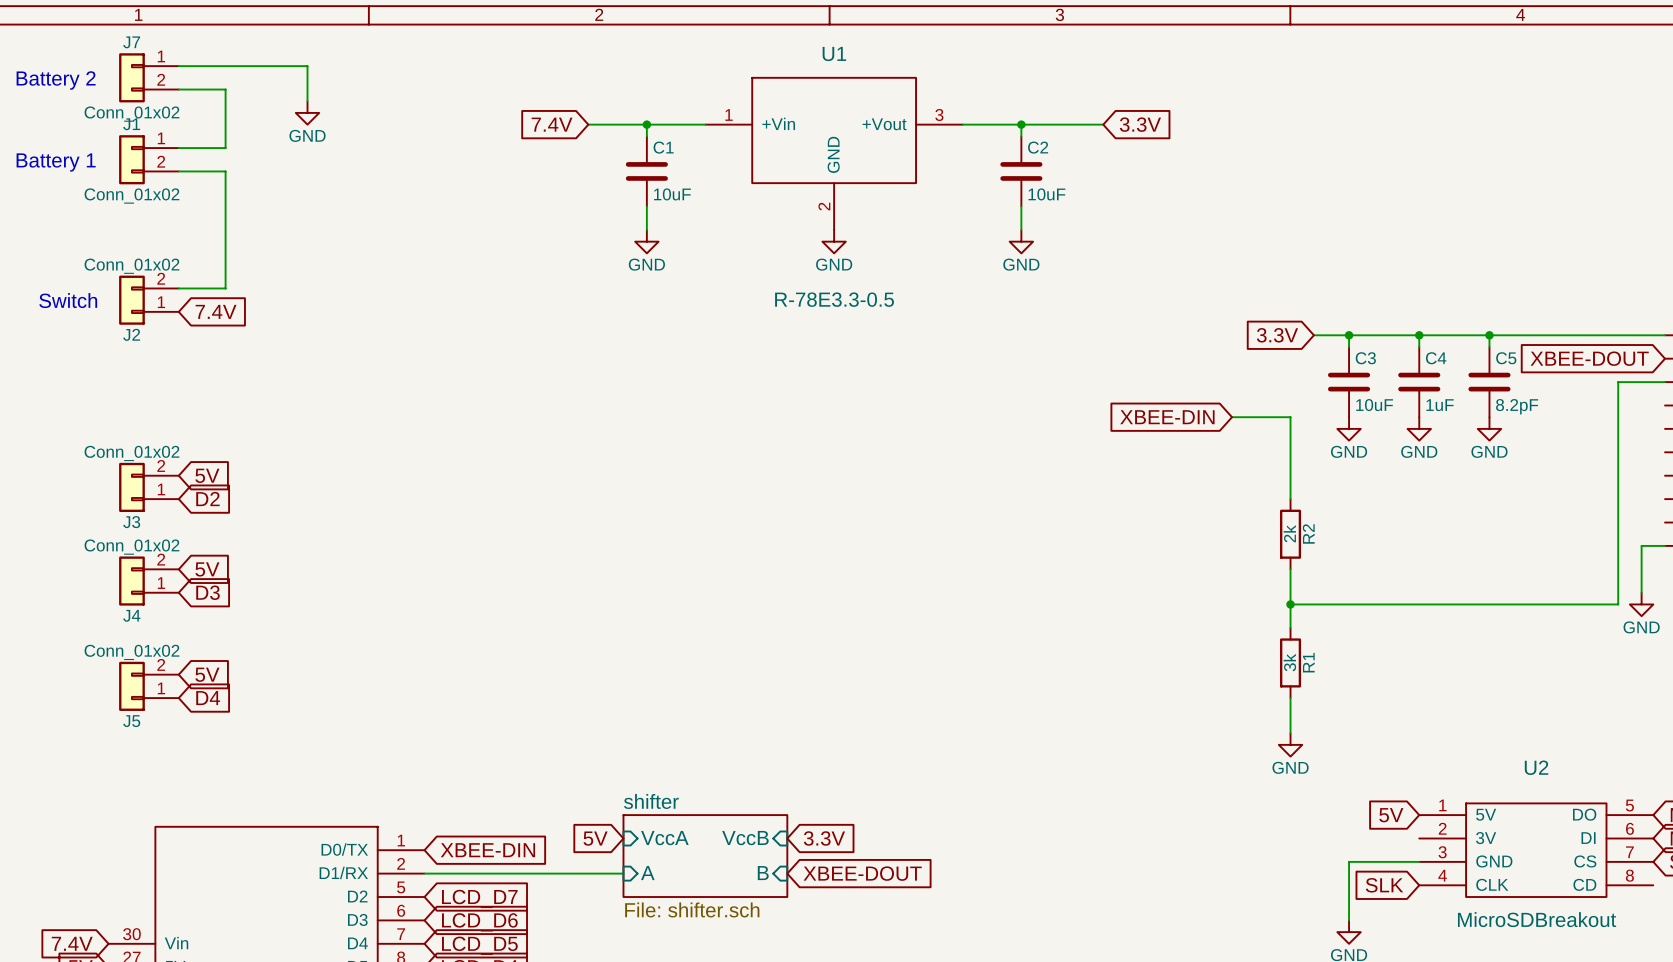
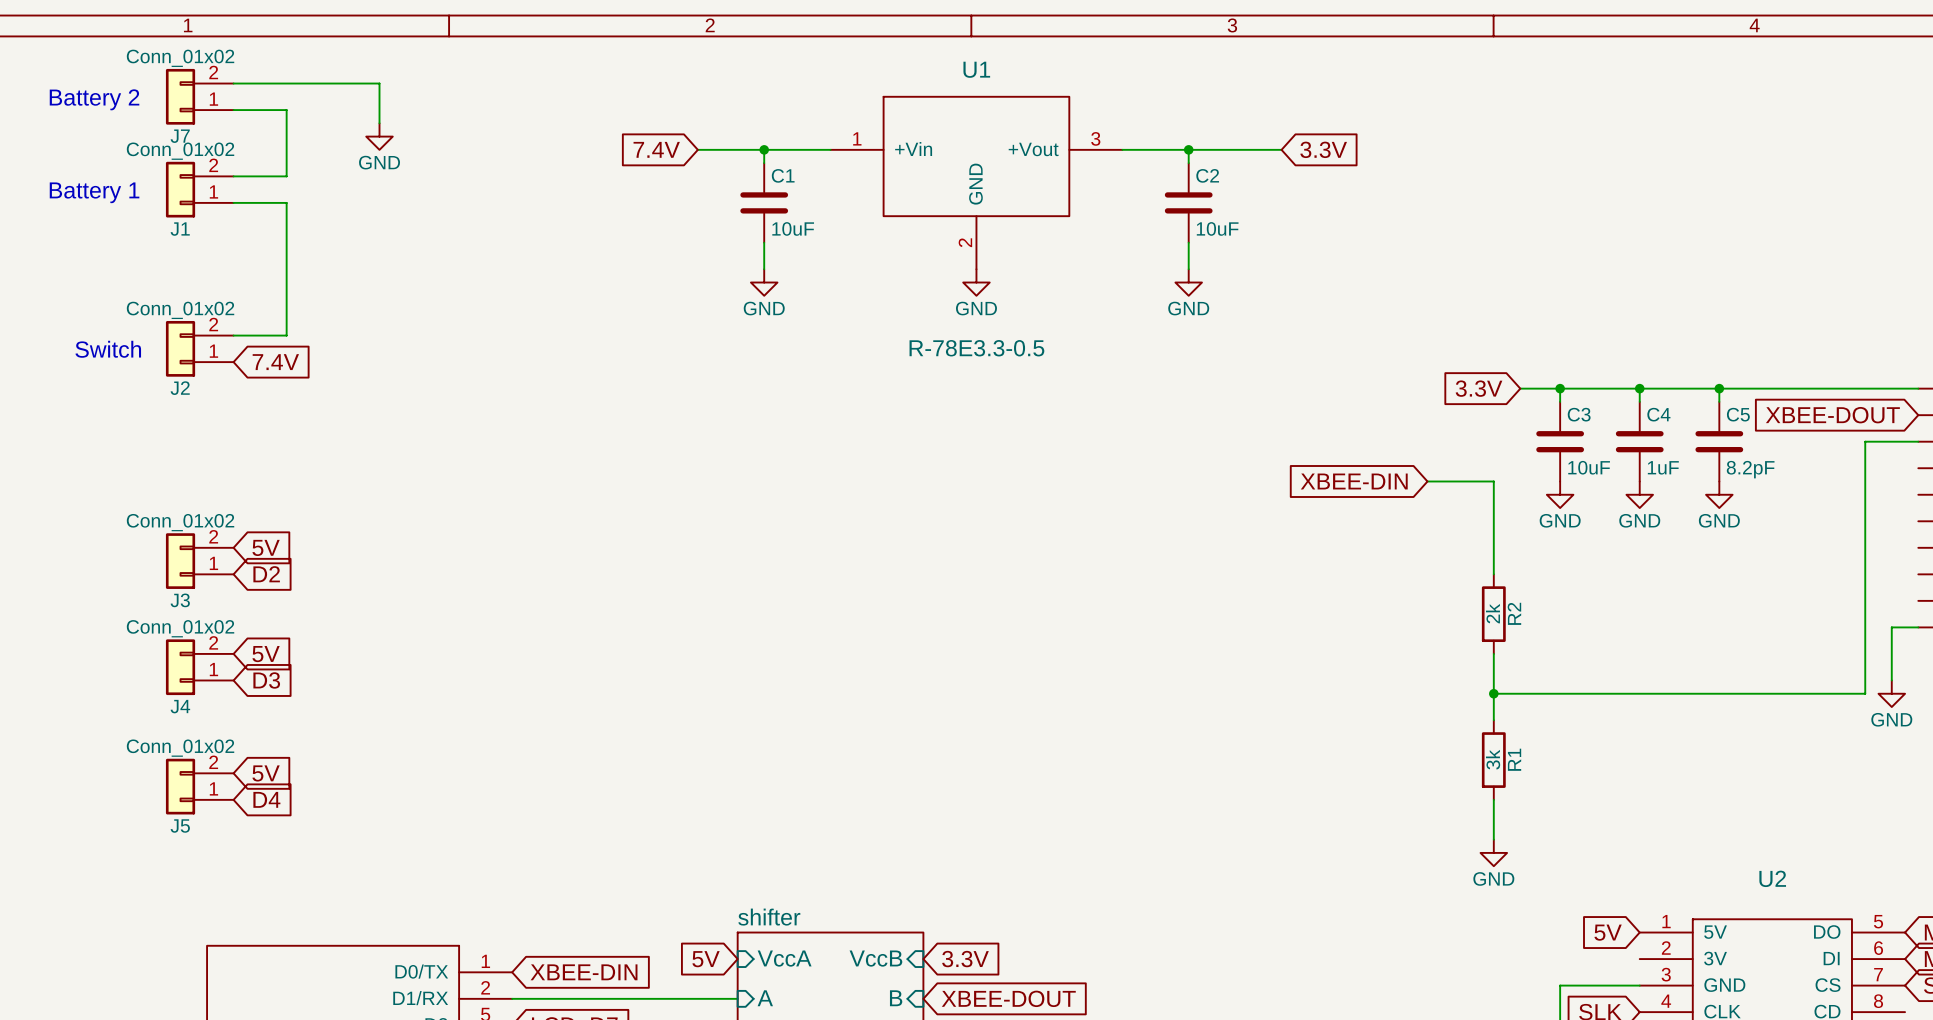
J7 flip: as is (131, 77) -> up-down (180, 96)
J1 flip: as is (131, 159) -> up-down (180, 189)

